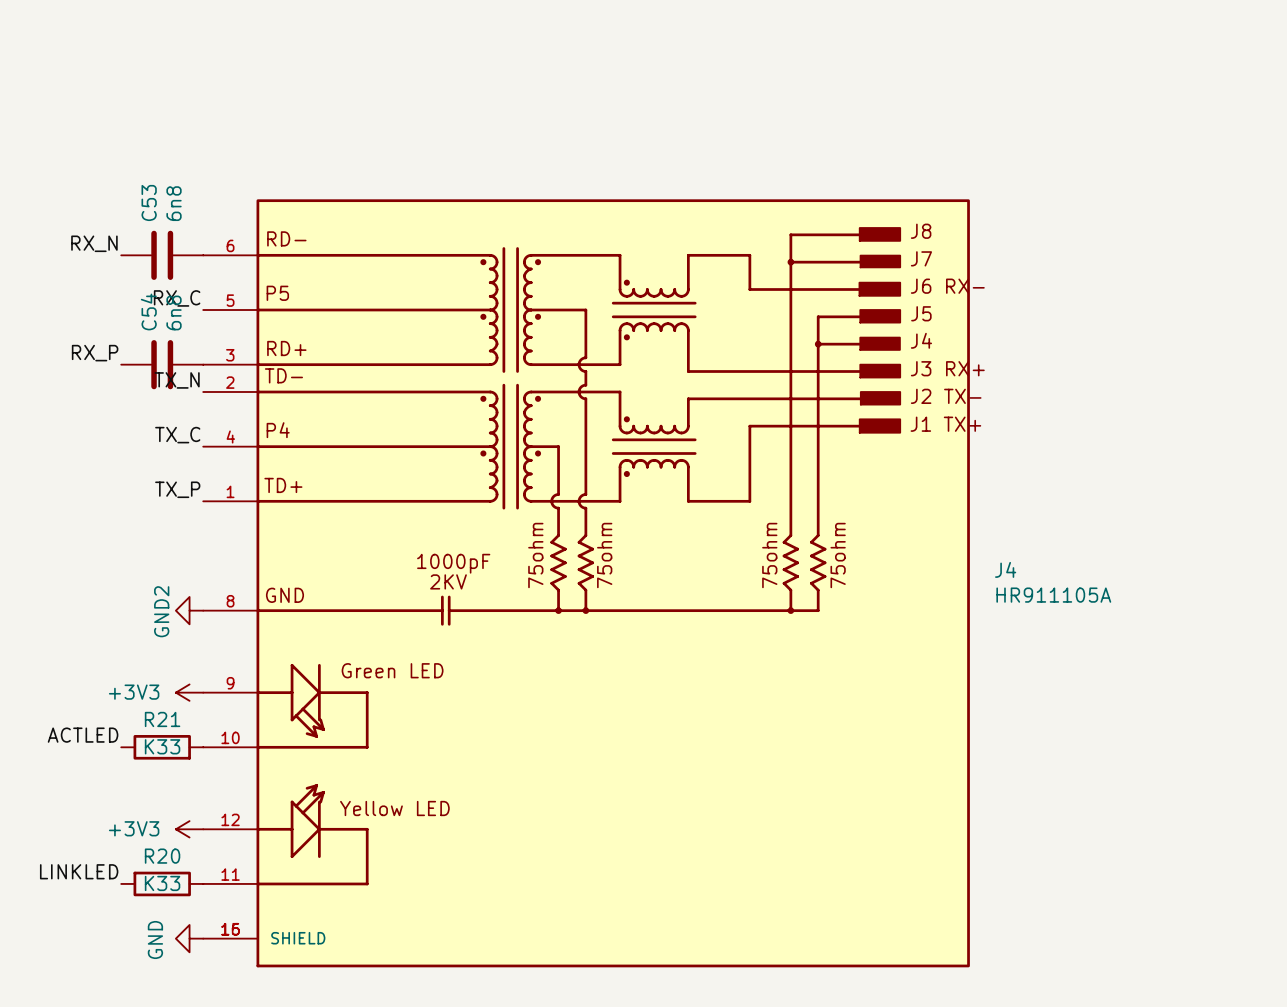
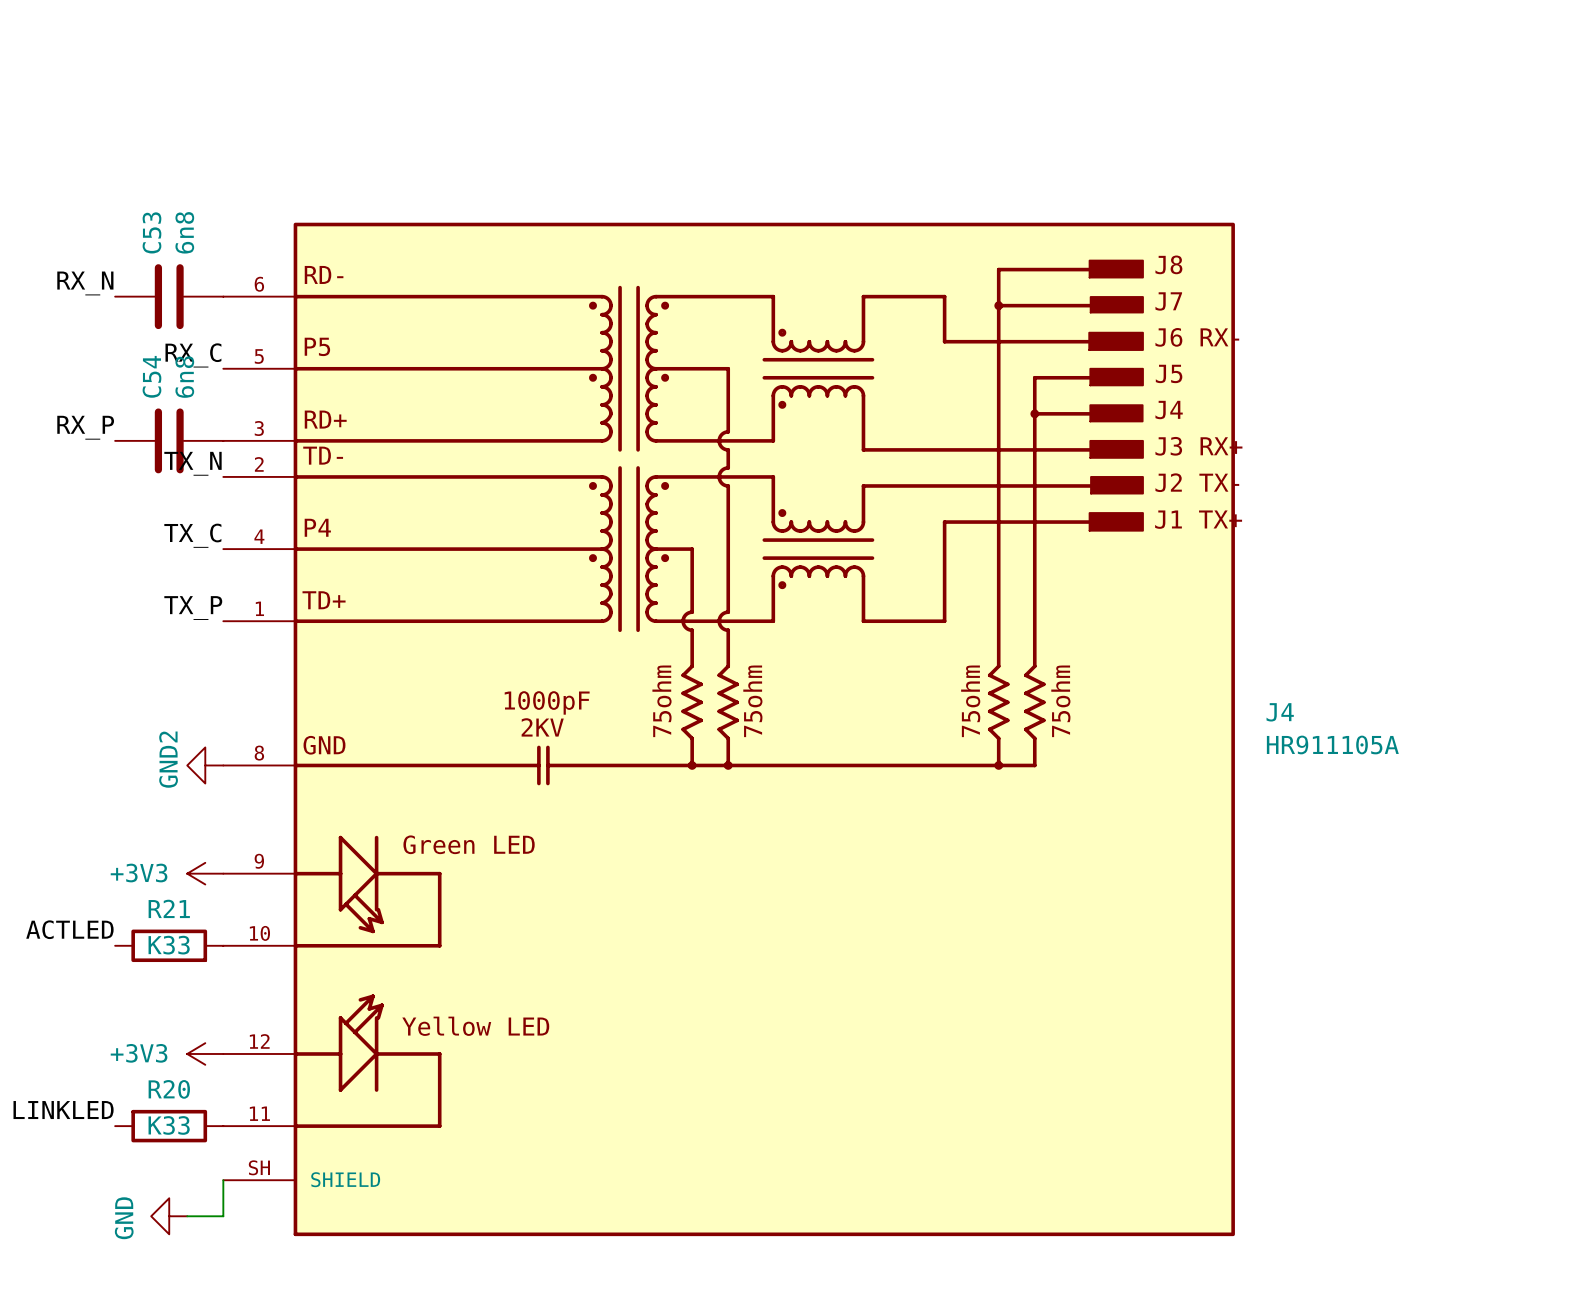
J4 symbol: [203, 199, 970, 968] -> [223, 222, 1235, 1237]
wire: none -> (223, 1180) (223, 1216) (187, 1216)
power symbol position: GND (189, 938) -> GND (169, 1216)

